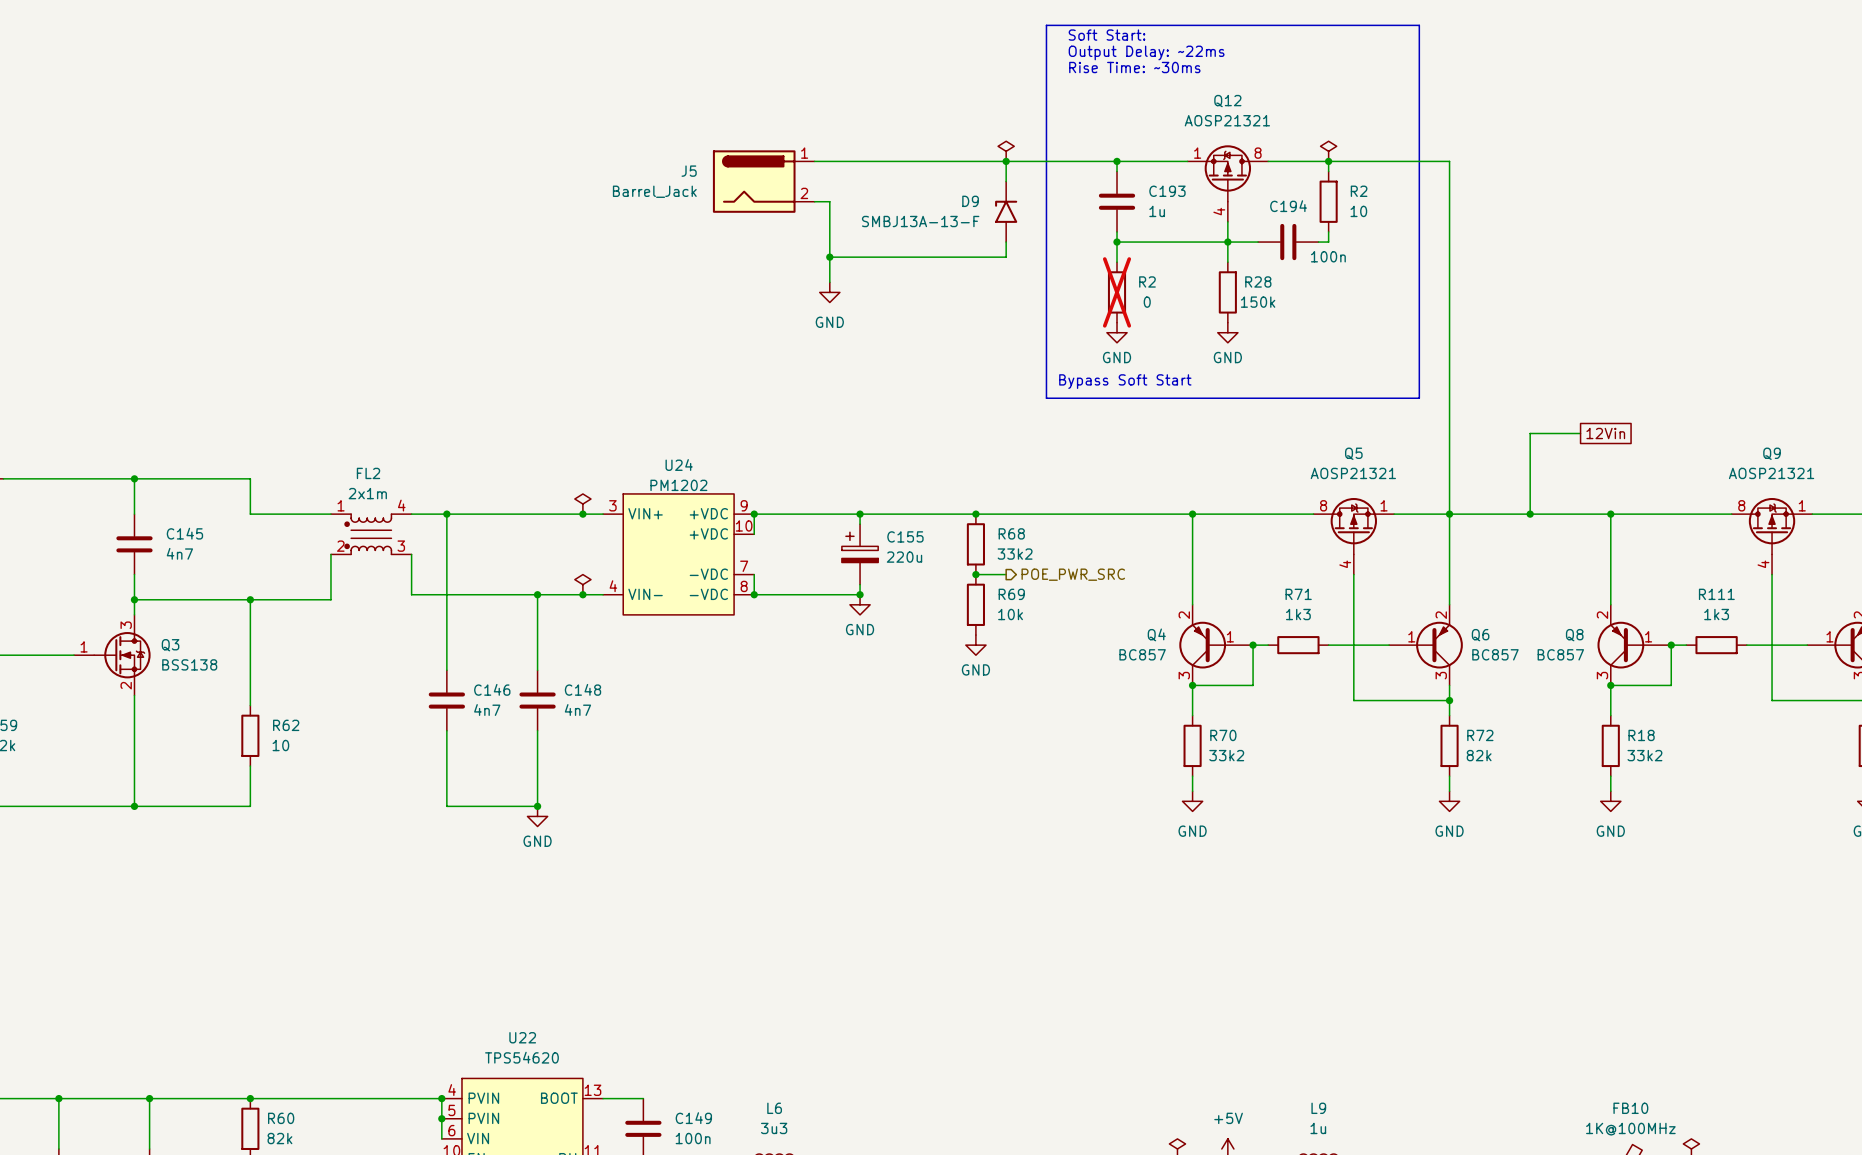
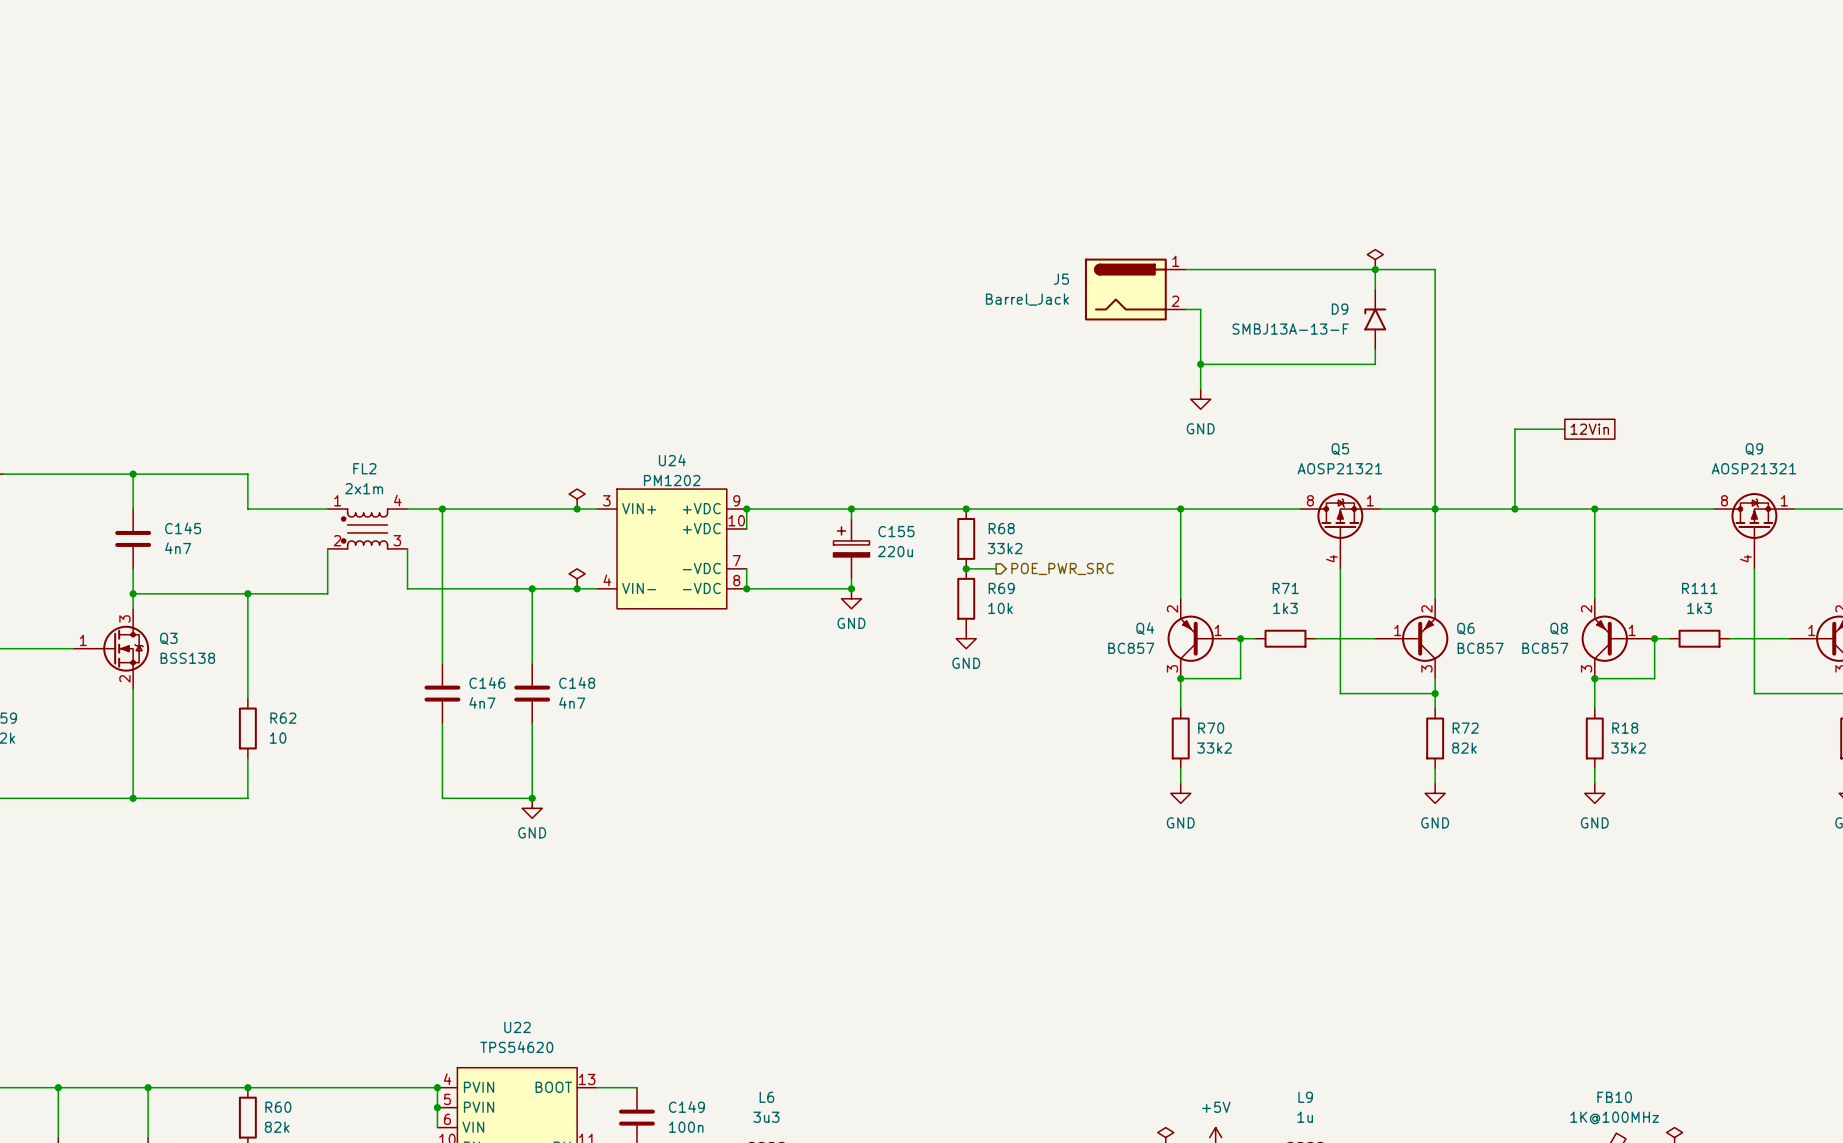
line: (1046, 25) (1419, 25) (1419, 398) (1046, 398) (1046, 25) -> none
text: Soft Start: (1107, 35) -> none
text: Output Delay: ~22ms (1146, 52) -> none
text: Rise Time: ~30ms (1134, 67) -> none
power symbol: (1006, 151) -> none
power symbol position: (1328, 151) -> (1375, 259)
wire: (814, 161) (1187, 161) -> none
wire: (1006, 161) (1006, 181) -> none
junction: (1006, 161) -> none
wire: (1117, 161) (1117, 171) -> none
junction: (1117, 161) -> none
wire: (1268, 161) (1449, 161) (1449, 272) -> (1185, 269) (1435, 269)
wire: (1328, 161) (1328, 171) -> none
junction: (1328, 161) -> none
J5 position: (763, 181) -> (1135, 289)
Q12: AOSP21321 (1227, 183) -> none
wire: (814, 201) (829, 201) (829, 282) -> none
C193: 1u (1117, 201) -> none
R2: 10 (1328, 201) -> none
D9 position: (1006, 211) -> (1375, 319)
wire: (1227, 221) (1227, 262) -> none
wire: (1117, 231) (1117, 262) -> none
wire: (1328, 231) (1328, 242) (1318, 242) -> none
wire: (1006, 242) (1006, 257) (829, 257) -> none
wire: (1117, 242) (1258, 242) -> none
junction: (1117, 242) -> none
junction: (1227, 242) -> none
C194: 100n (1288, 242) -> none
junction: (829, 257) -> none
wire: none -> (1375, 269) (1375, 289)
junction: none -> (1375, 269)
power symbol: GND (829, 292) -> none
R2: 0 (1117, 292) -> none
R28: 150k (1227, 292) -> none
wire: none -> (1185, 309) (1200, 309) (1200, 389)
power symbol: GND (1117, 332) -> none
power symbol: GND (1227, 332) -> none
wire: none -> (1375, 349) (1375, 364) (1200, 364)
junction: none -> (1200, 364)
text: Bypass Soft Start (1125, 381) -> none
power symbol: none -> GND (1200, 399)

